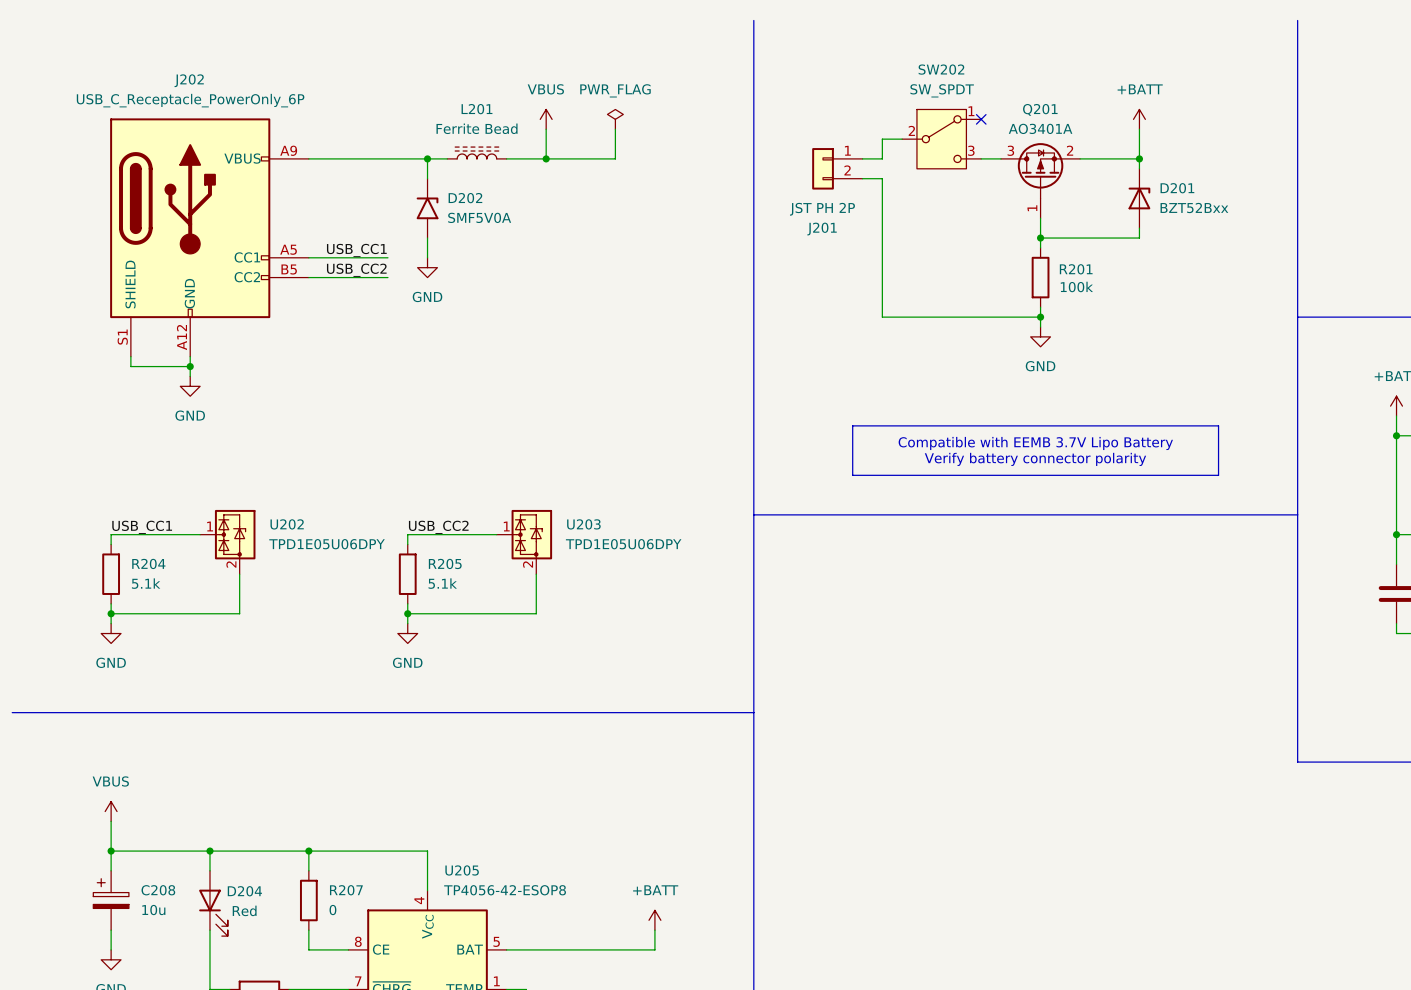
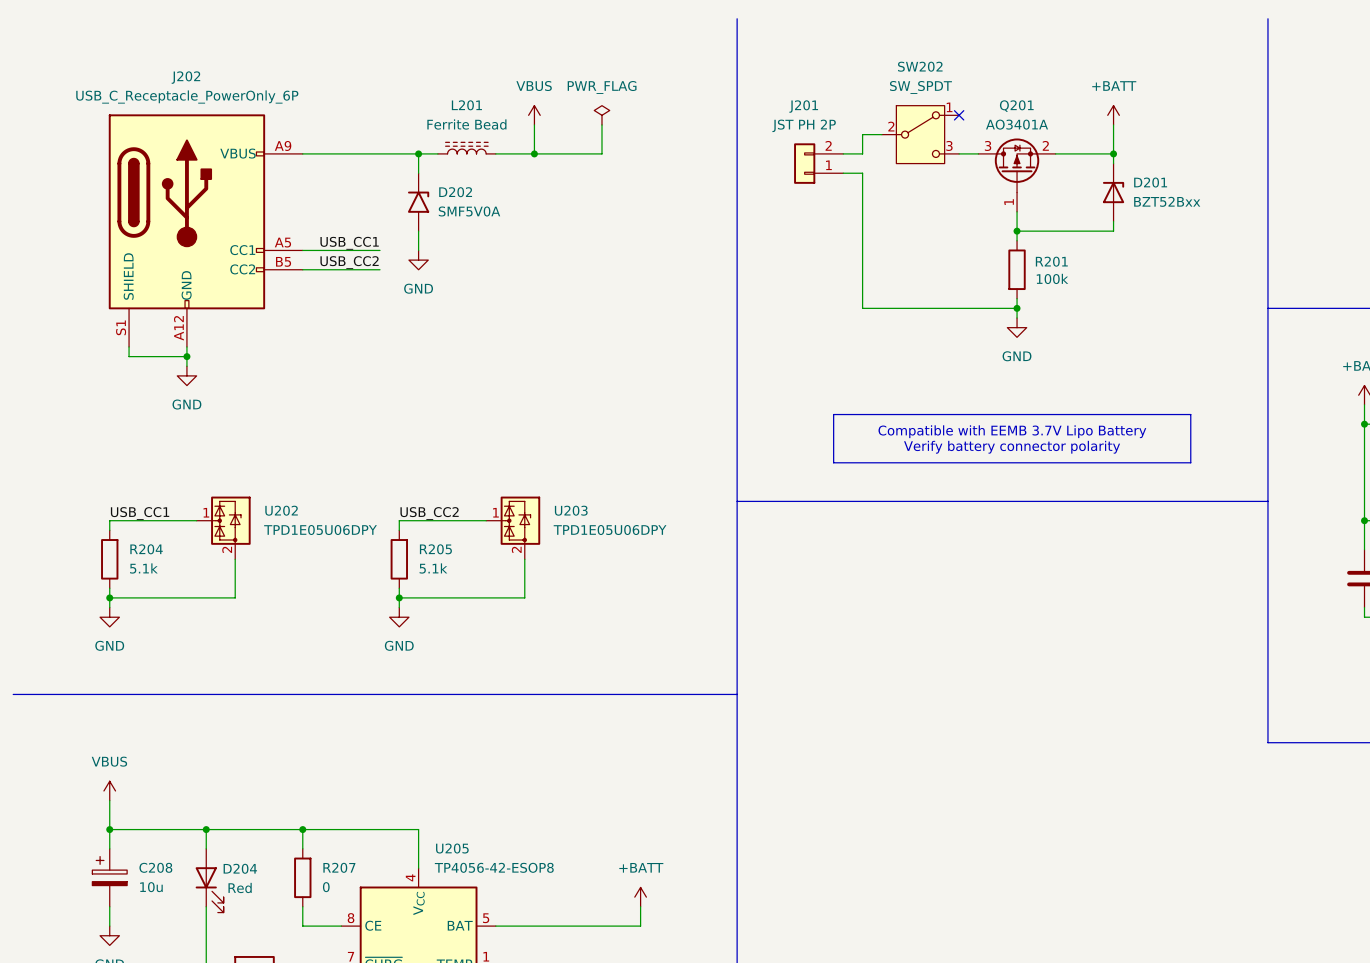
J201 flip: as is (823, 168) -> up-down (804, 163)

